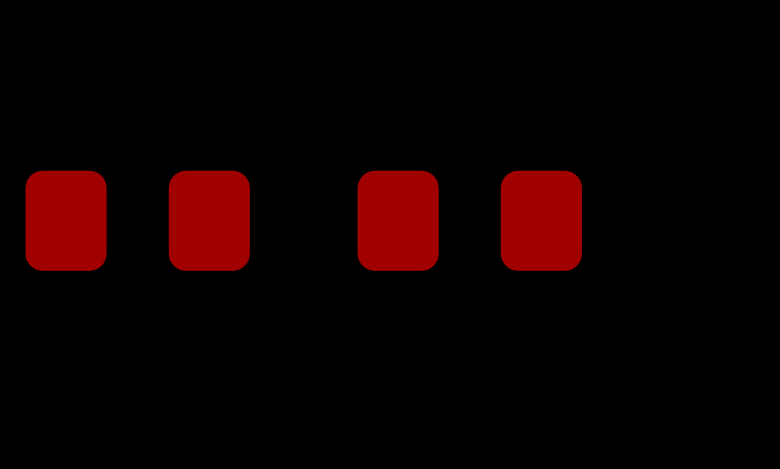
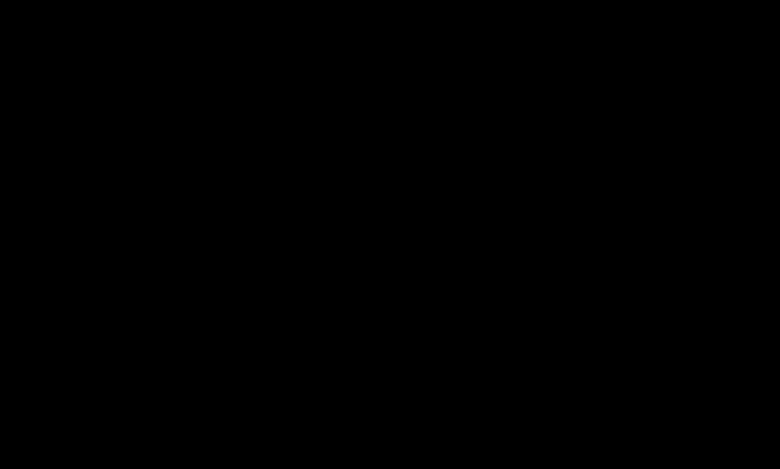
part: (137, 220) -> none
part: (469, 220) -> none

